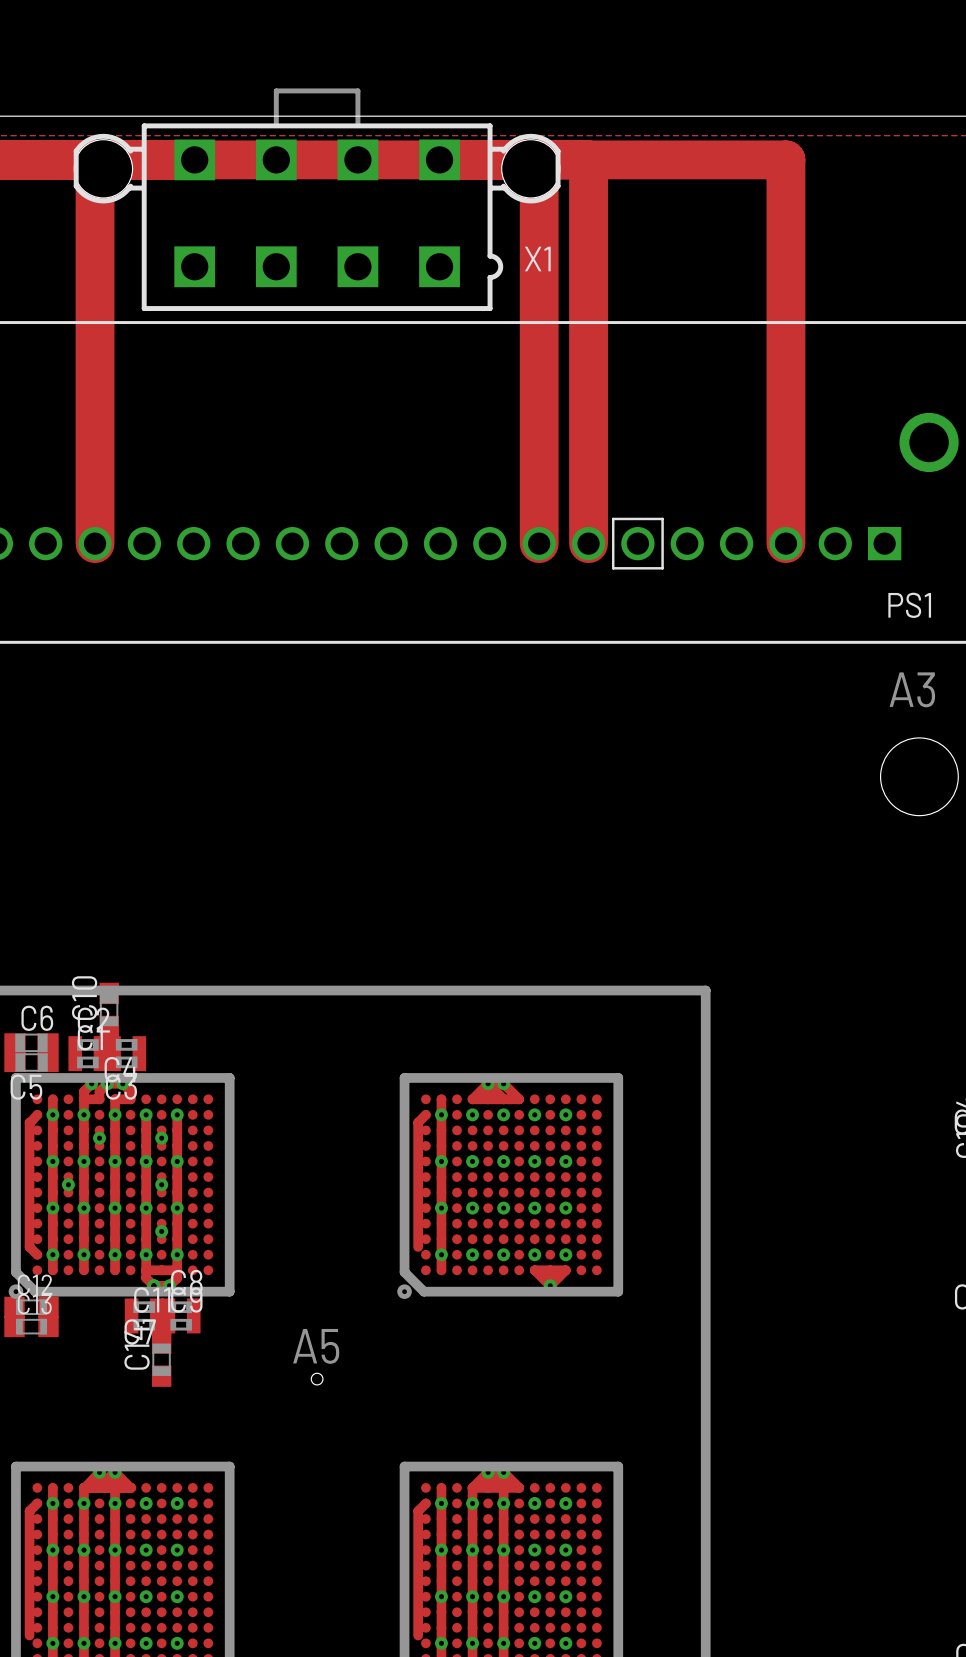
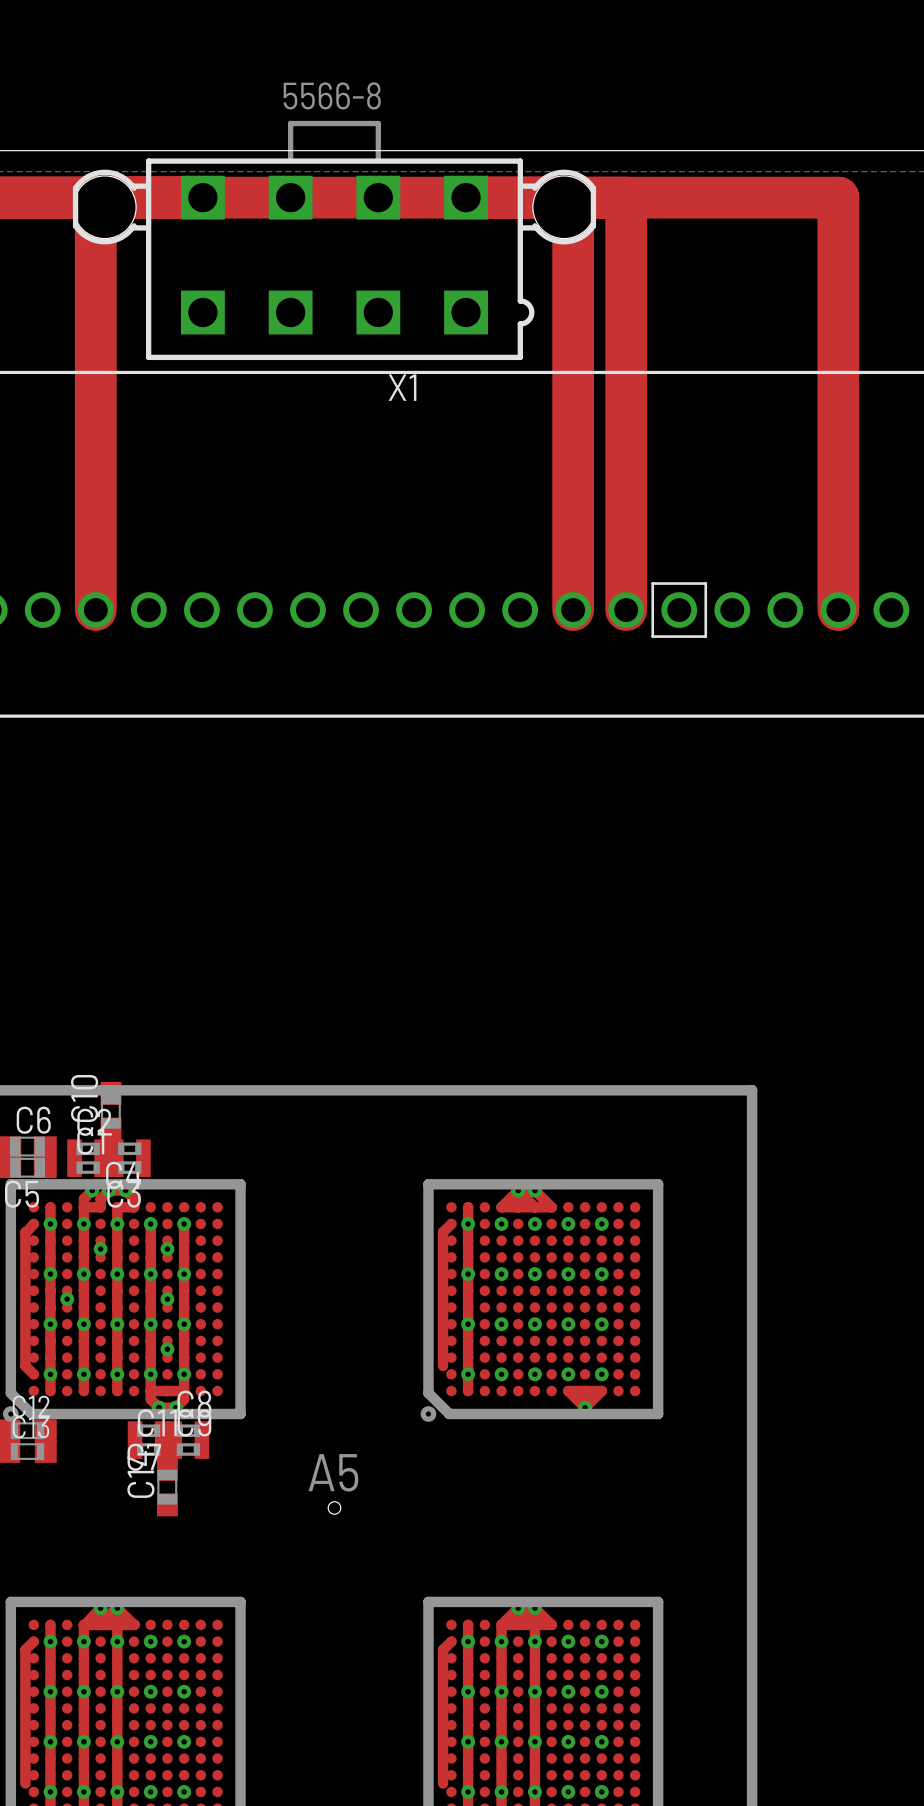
X1 value: none -> 5566-8 (332, 95)
X1 name position: X1 (537, 258) -> X1 (402, 387)

